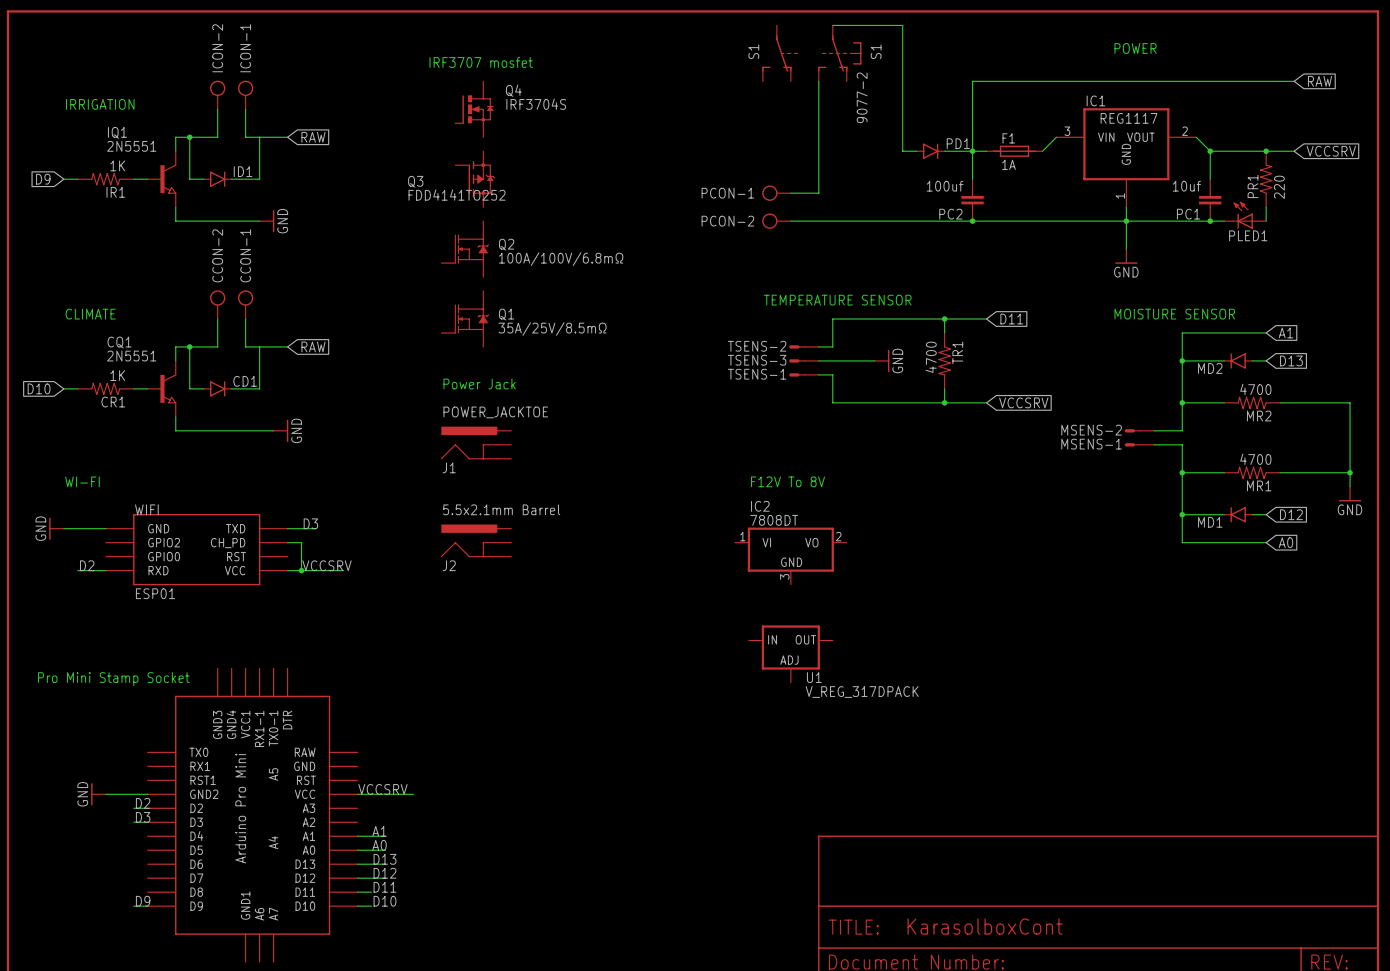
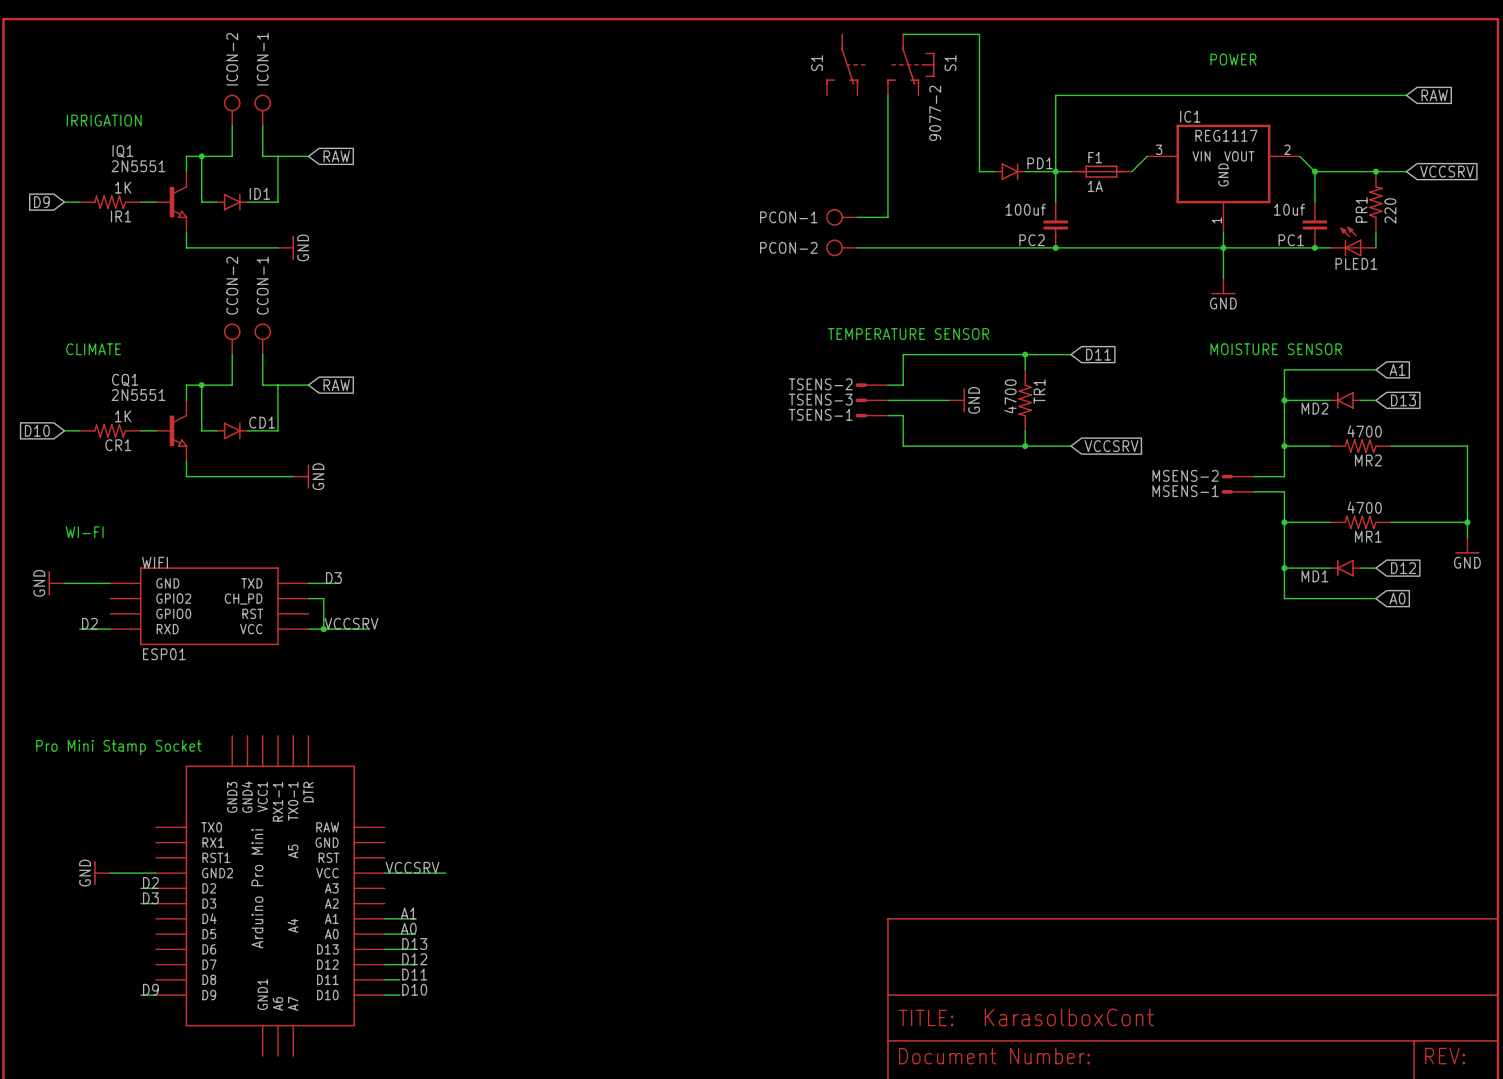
text: IRF3707 mosfet (481, 62) -> none
Q4: IRF3704S (474, 109) -> none
Q3: FDD4141TO252 (475, 179) -> none
Q2: 100A/100V/6.8mΩ (465, 249) -> none
Q1: 35A/25V/8.5mΩ (465, 319) -> none
text: Power Jack (479, 384) -> none
J1: POWER_JACKTOE (476, 442) -> none
text: F12V To 8V (788, 481) -> none
J2: 5.5x2.1mm Barrel (476, 540) -> none
IC2: 7808DT (790, 556) -> none
U1: V_REG_317DPACK (790, 653) -> none

